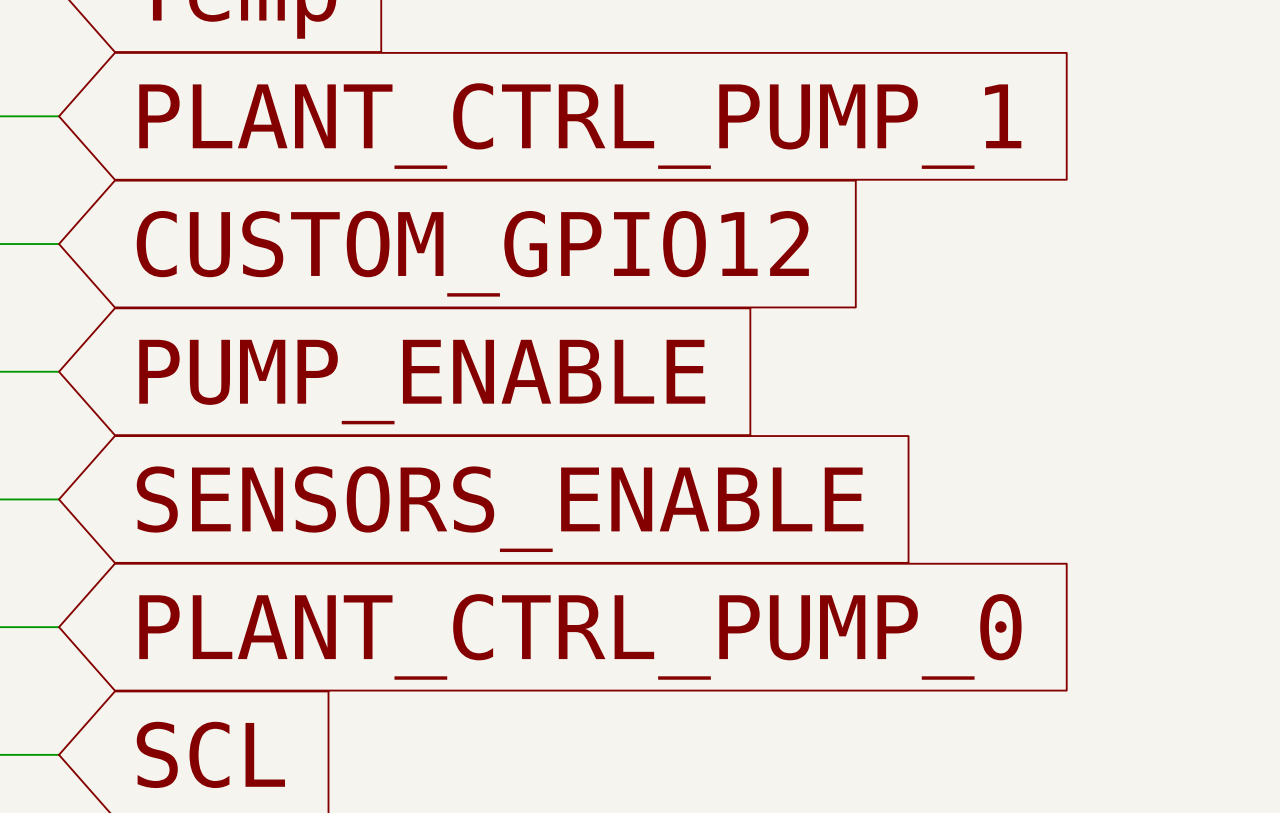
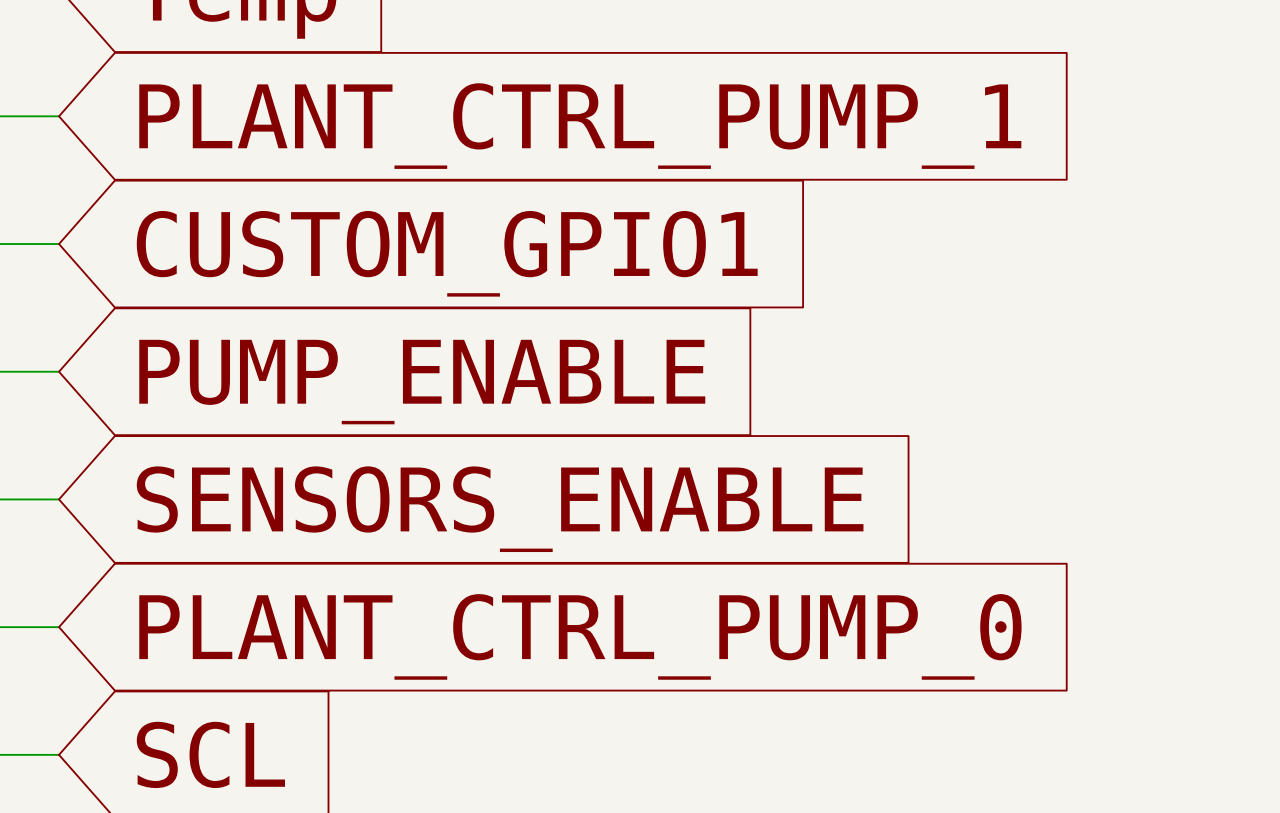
global label: CUSTOM_GPIO12 (472, 253) -> CUSTOM_GPIO1 (447, 253)

